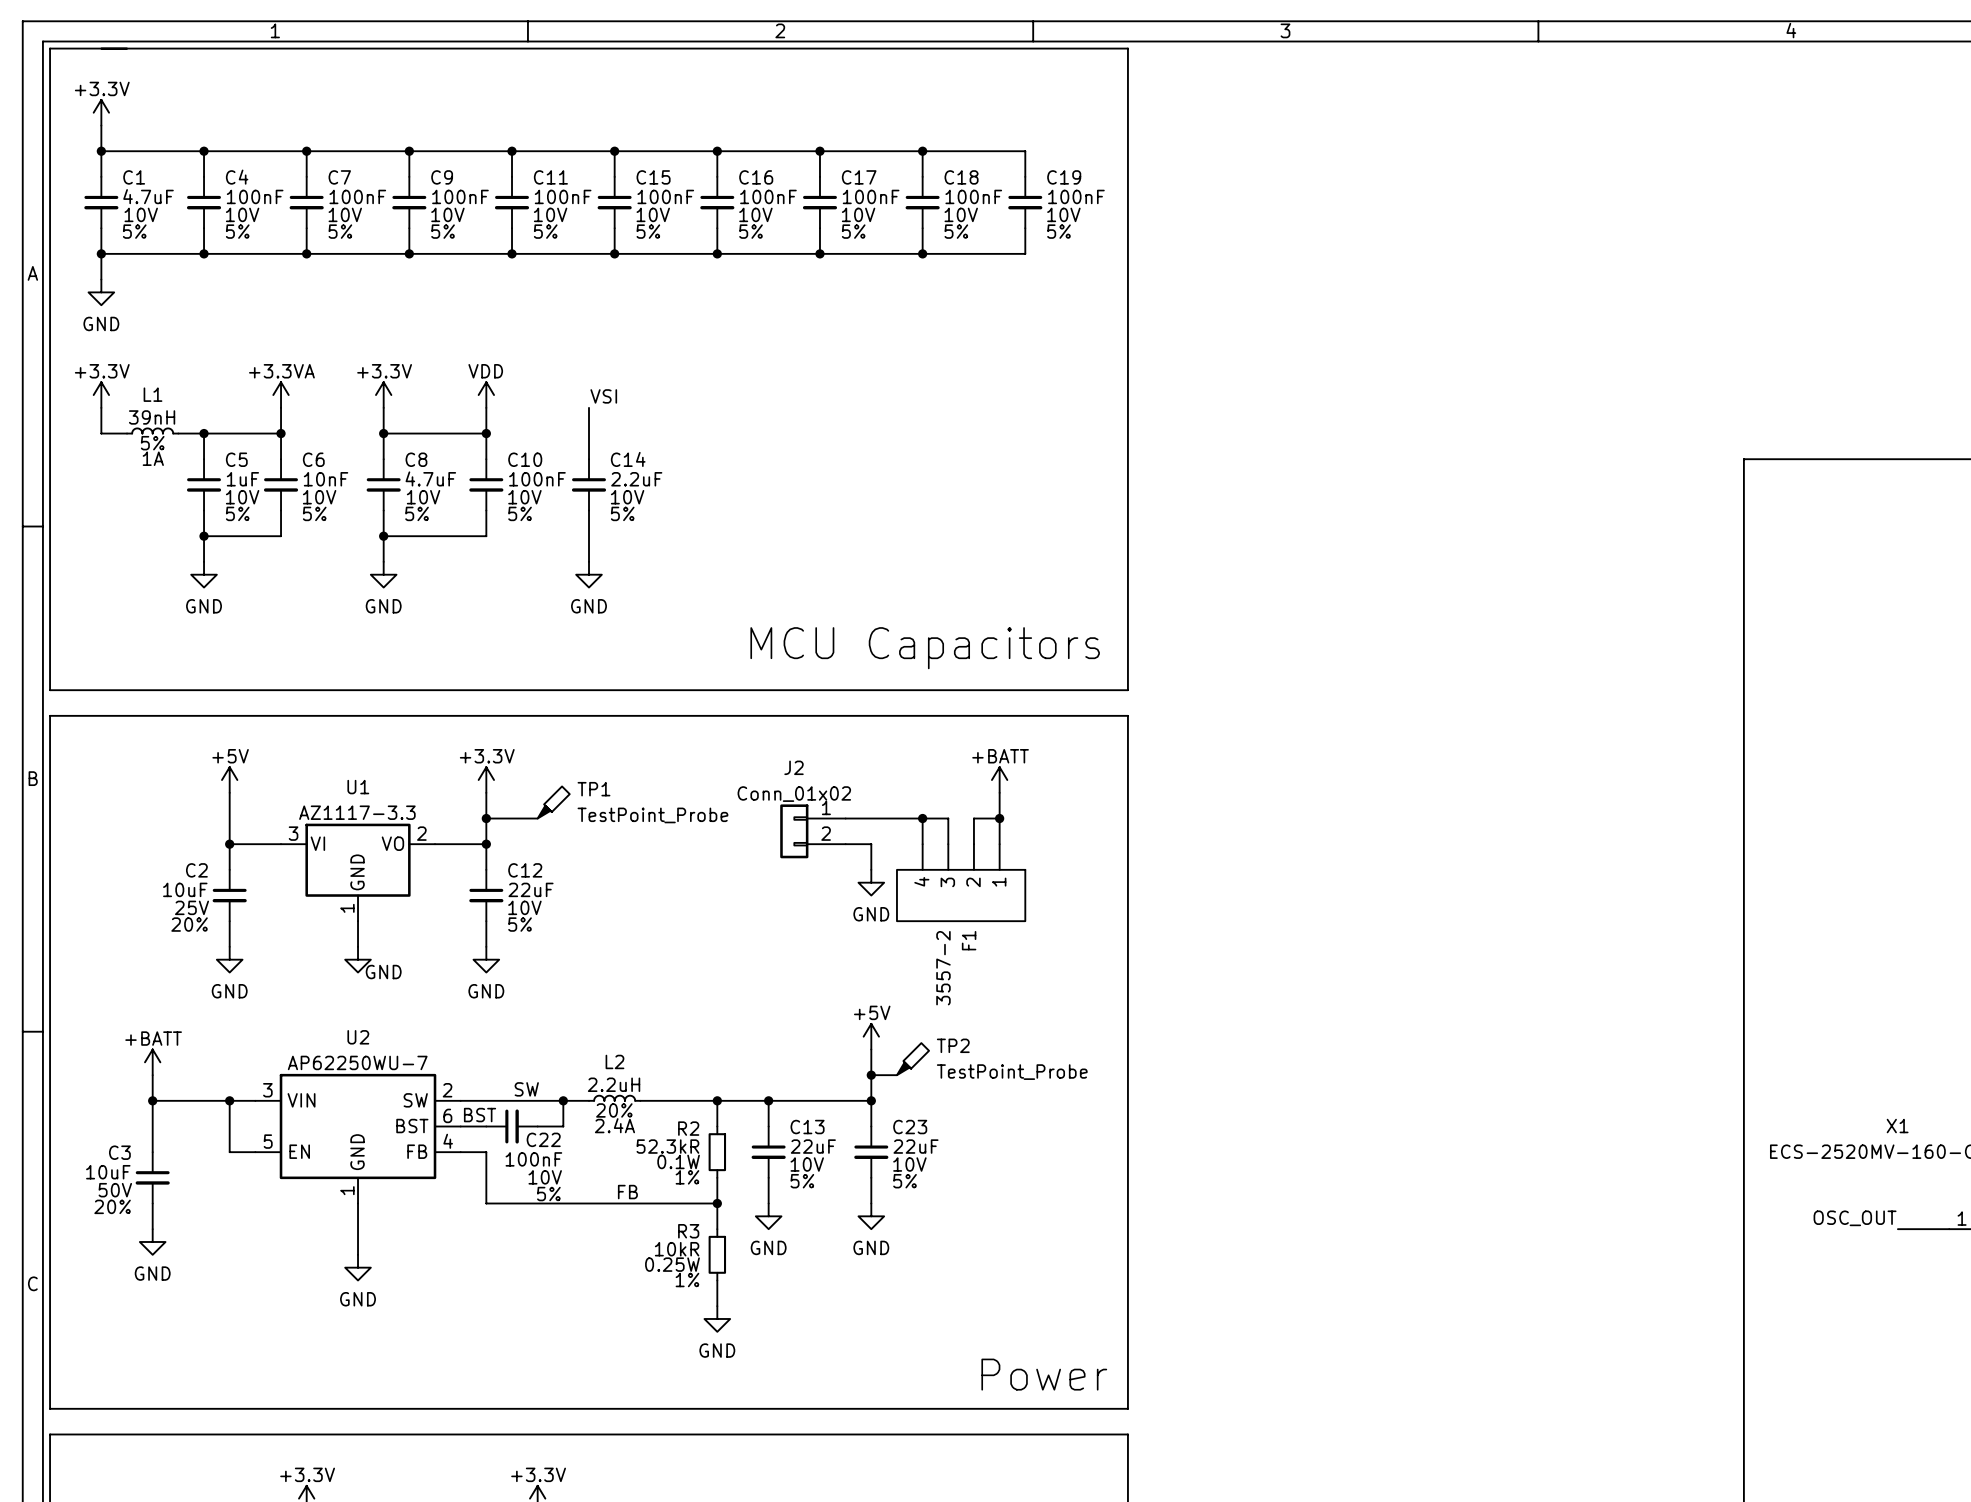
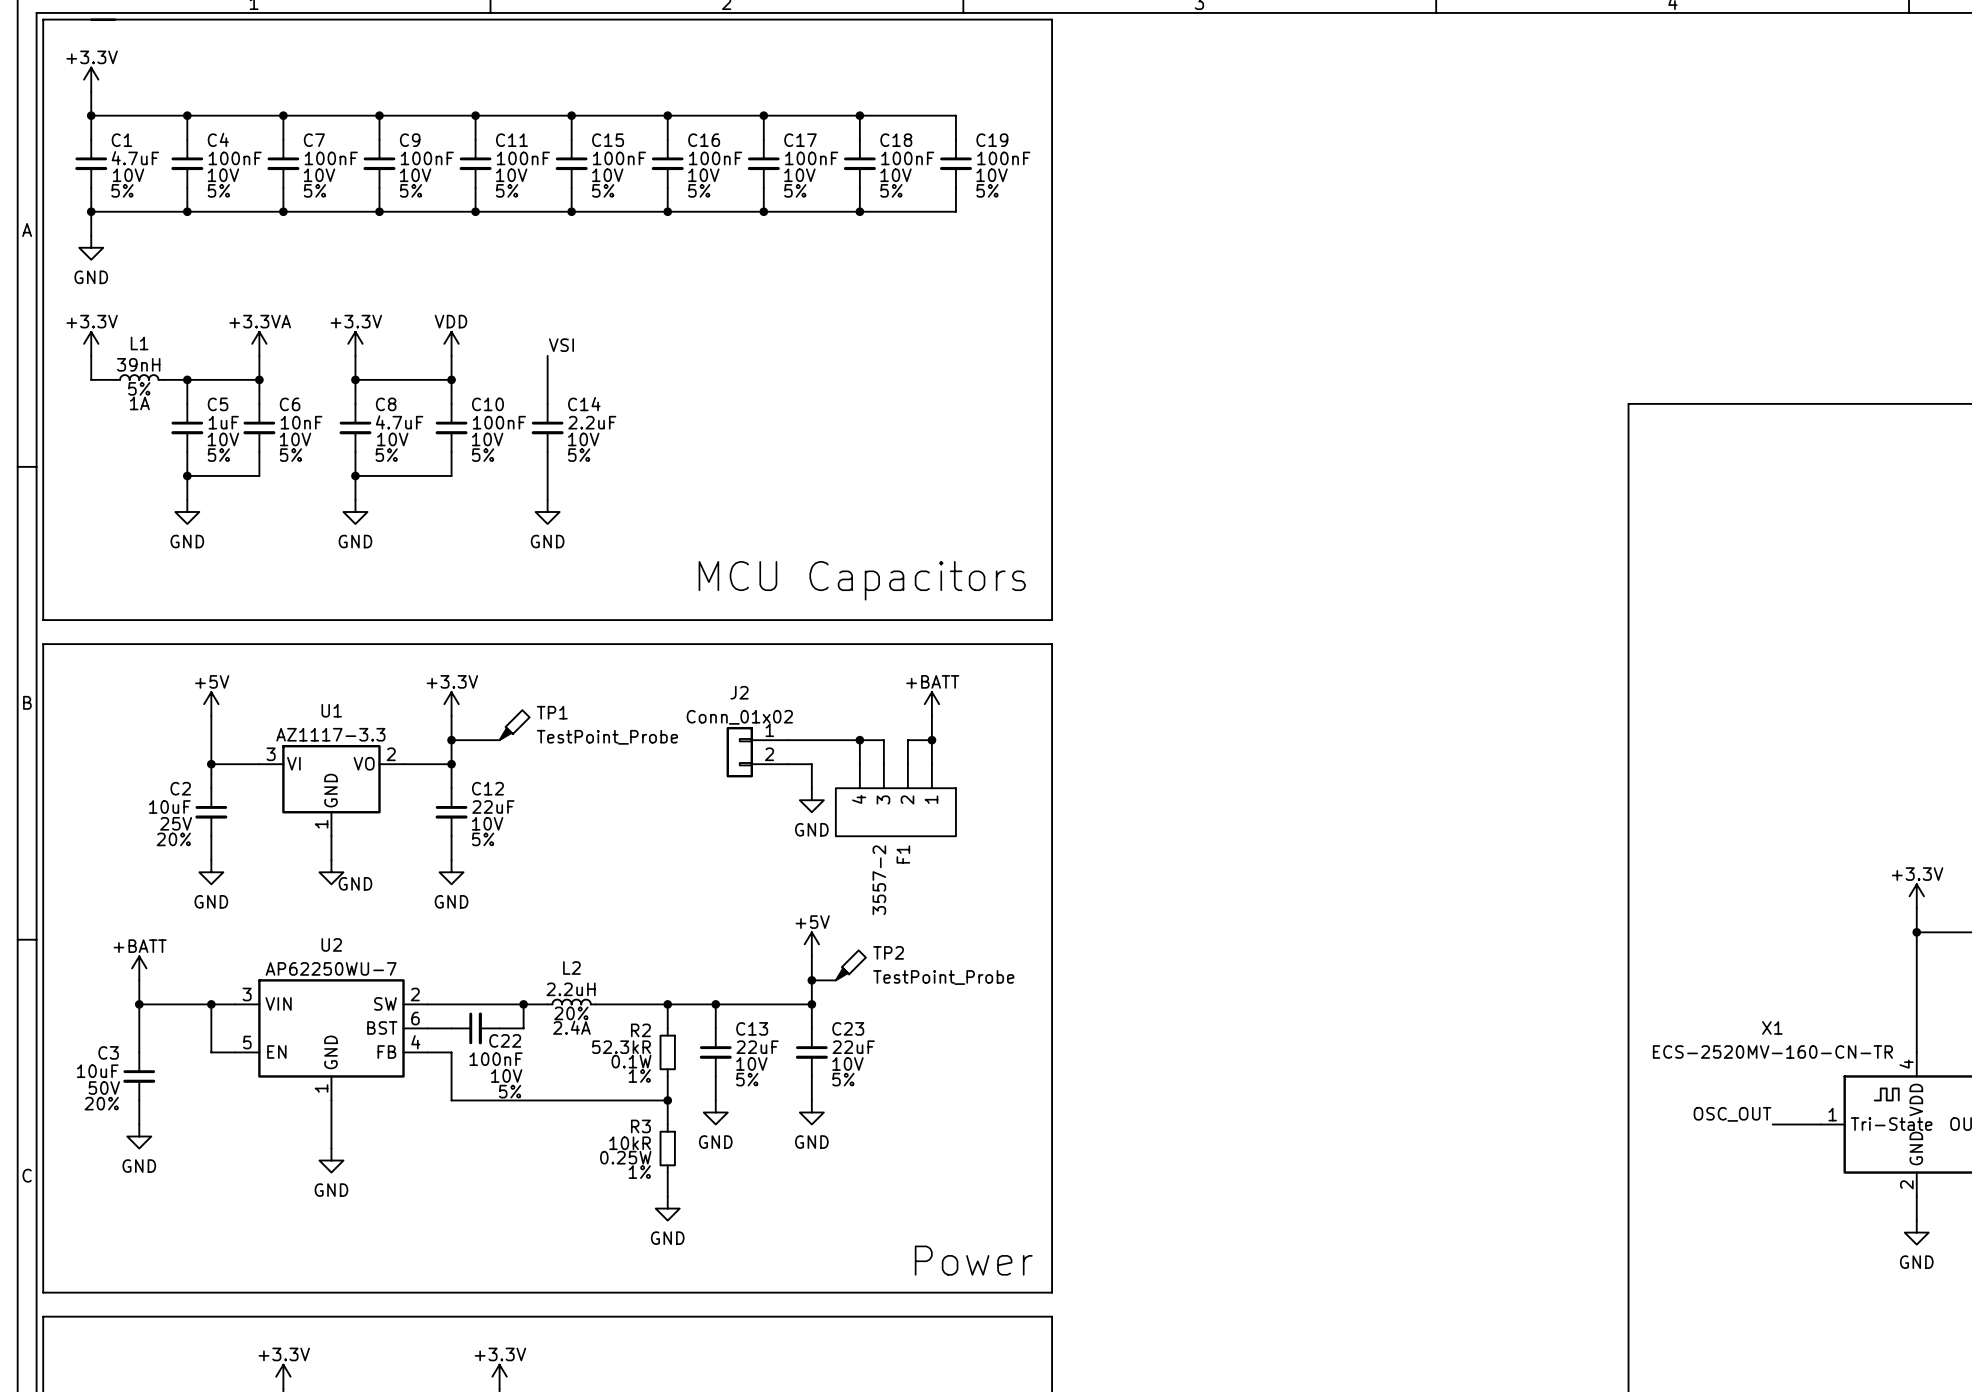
label: SW (526, 1089) -> none
label: BST (480, 1115) -> none
label: FB (627, 1192) -> none

